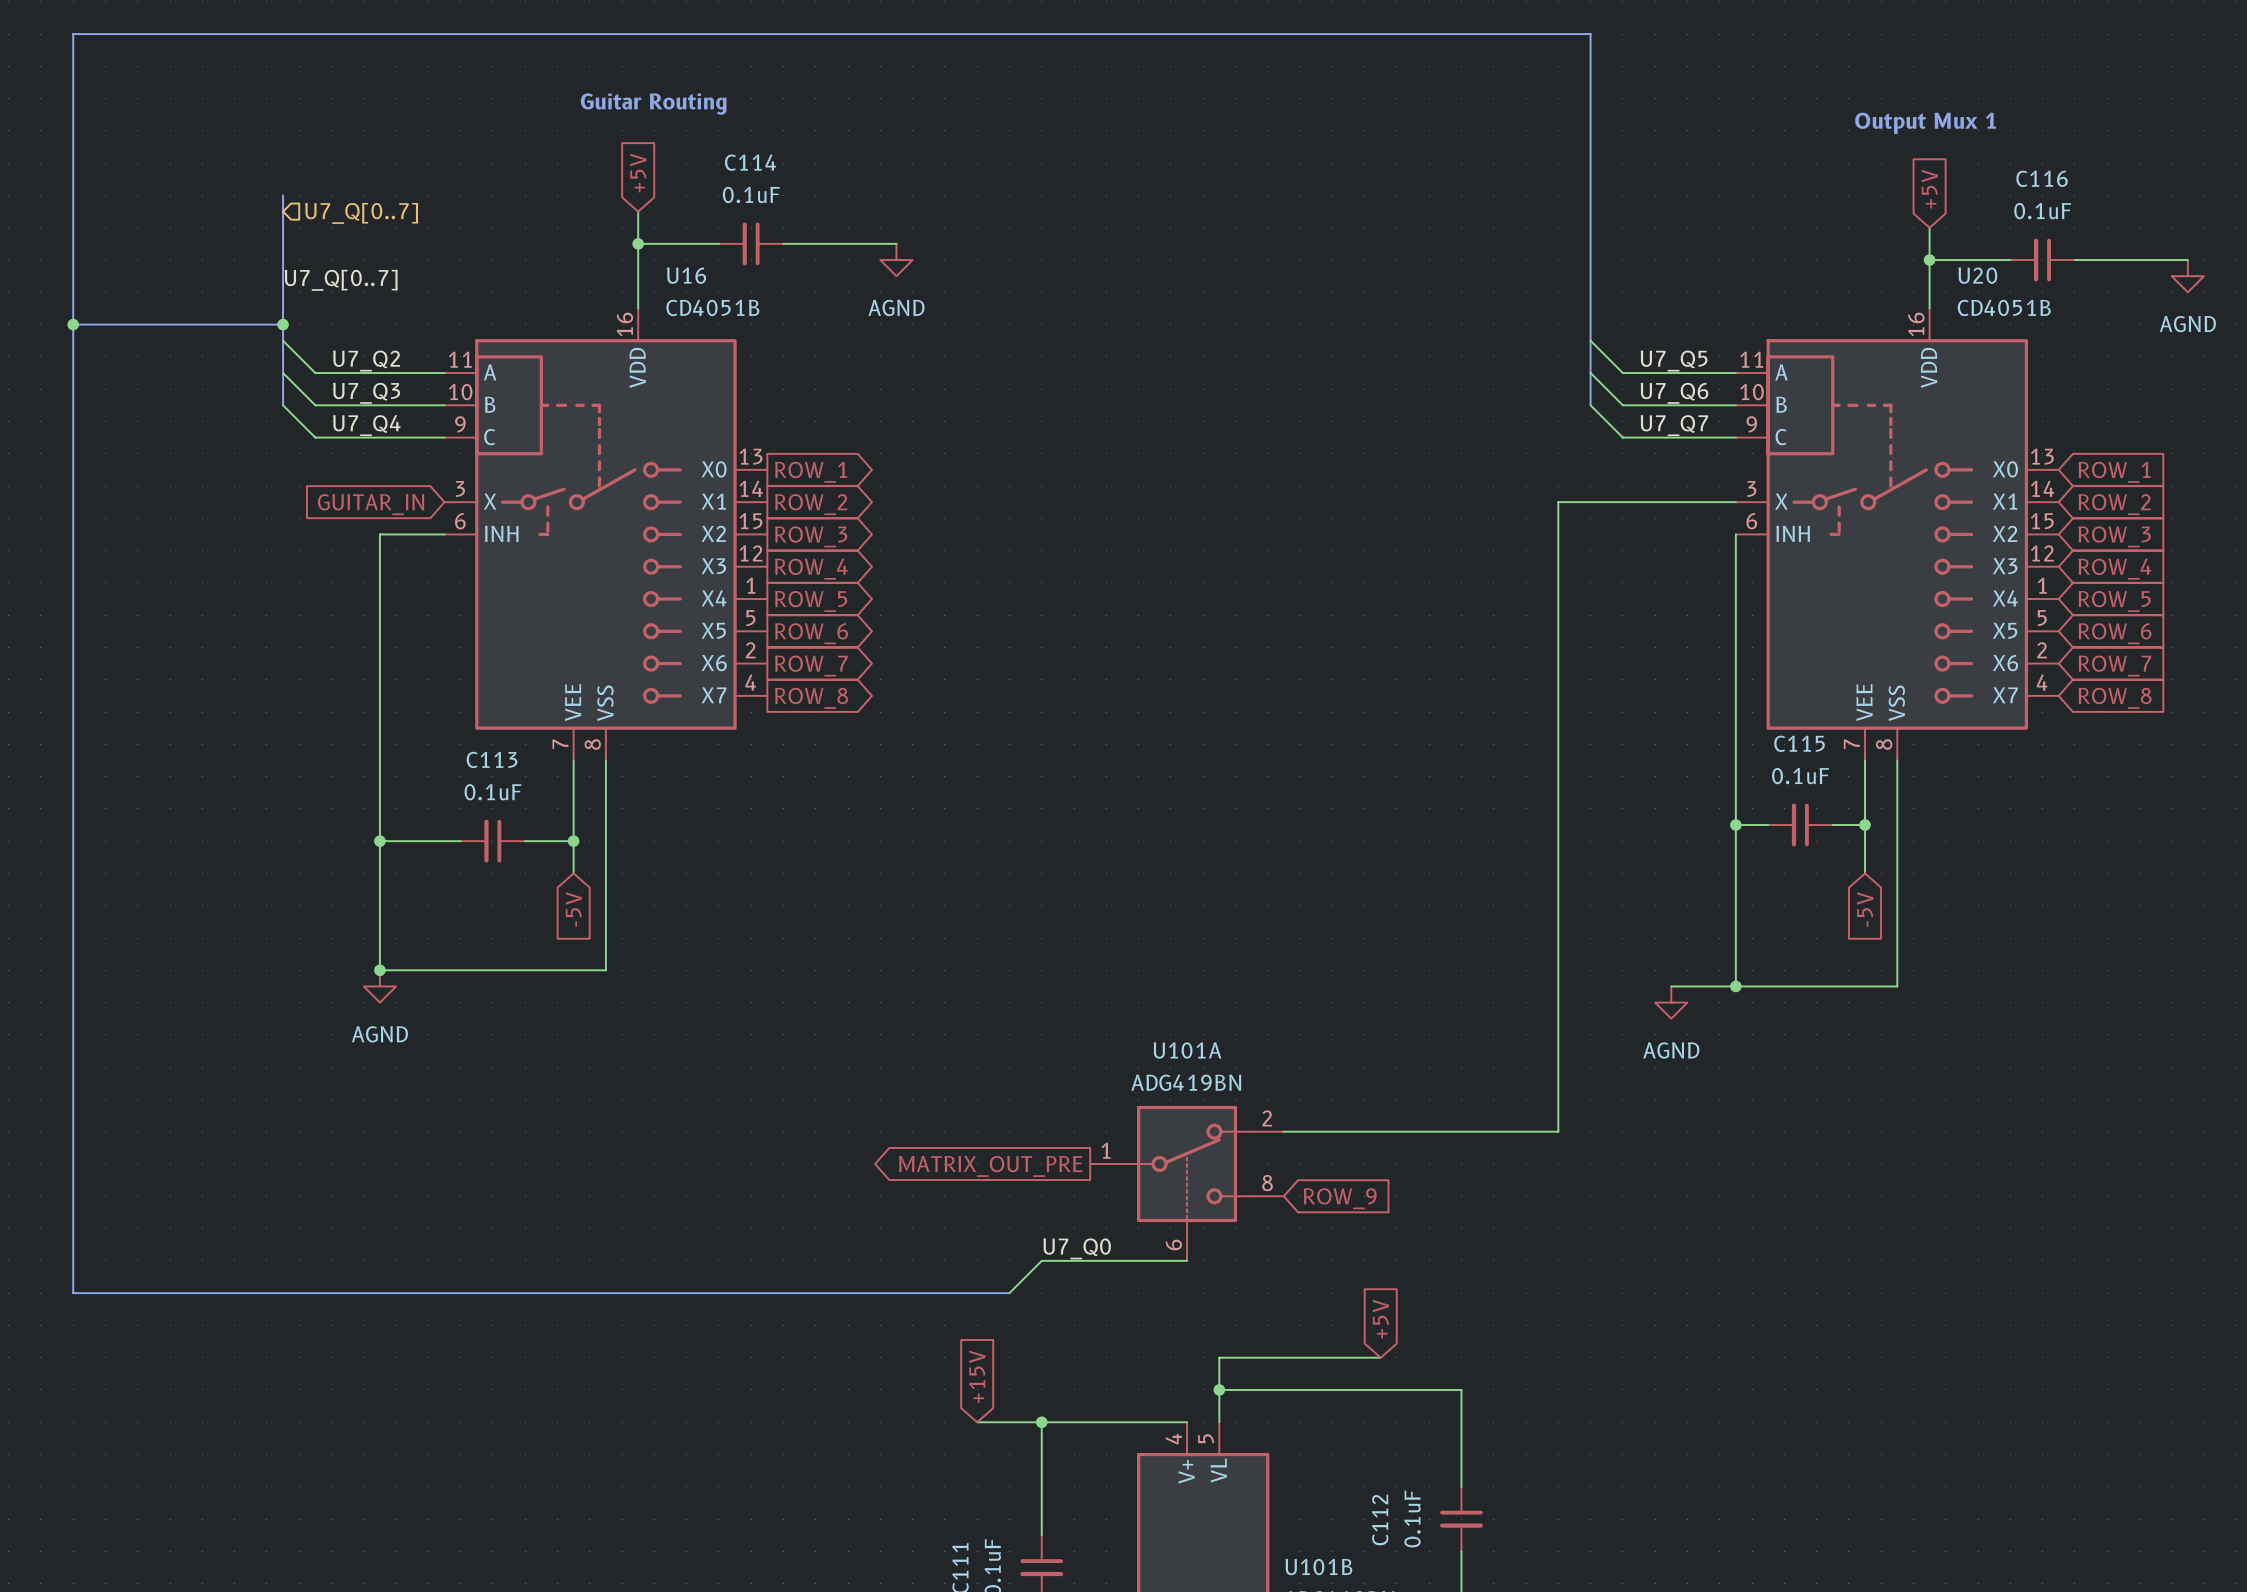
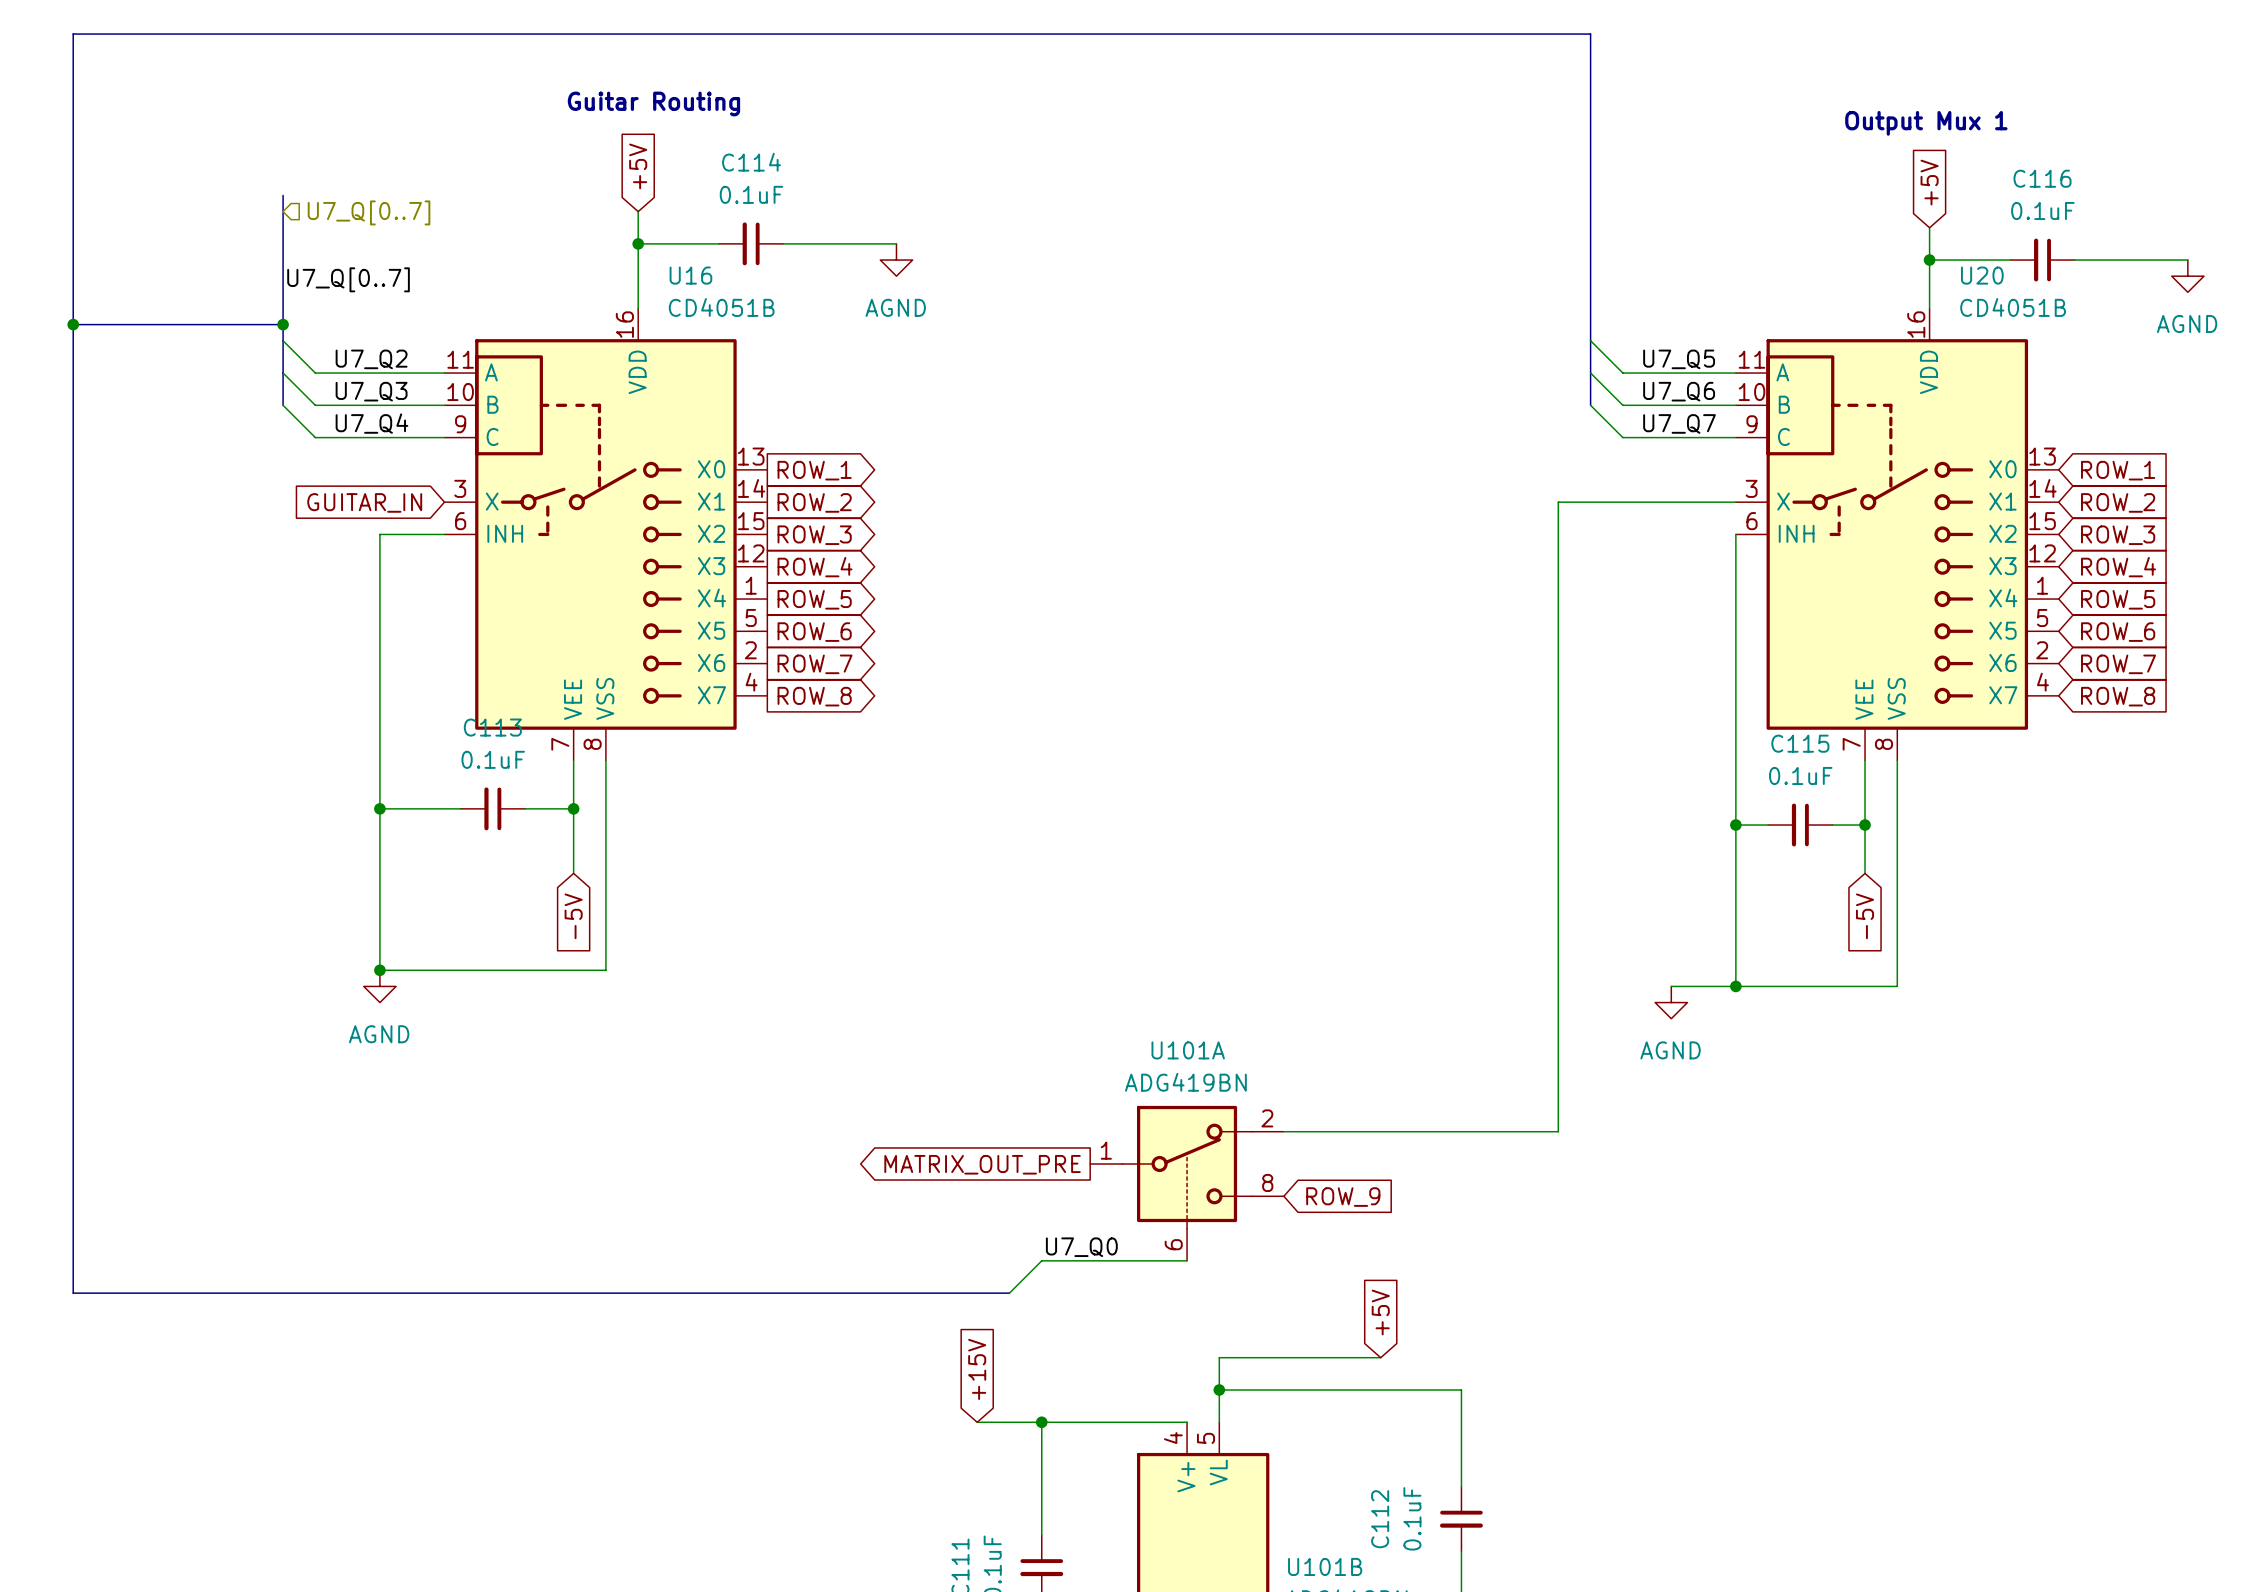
wire: (379, 841) (460, 841) -> (379, 808) (460, 808)
junction position: (379, 841) -> (379, 808)
C113 position: (492, 841) -> (492, 808)
wire: (525, 841) (573, 841) -> (525, 808) (573, 808)
junction position: (573, 841) -> (573, 808)

